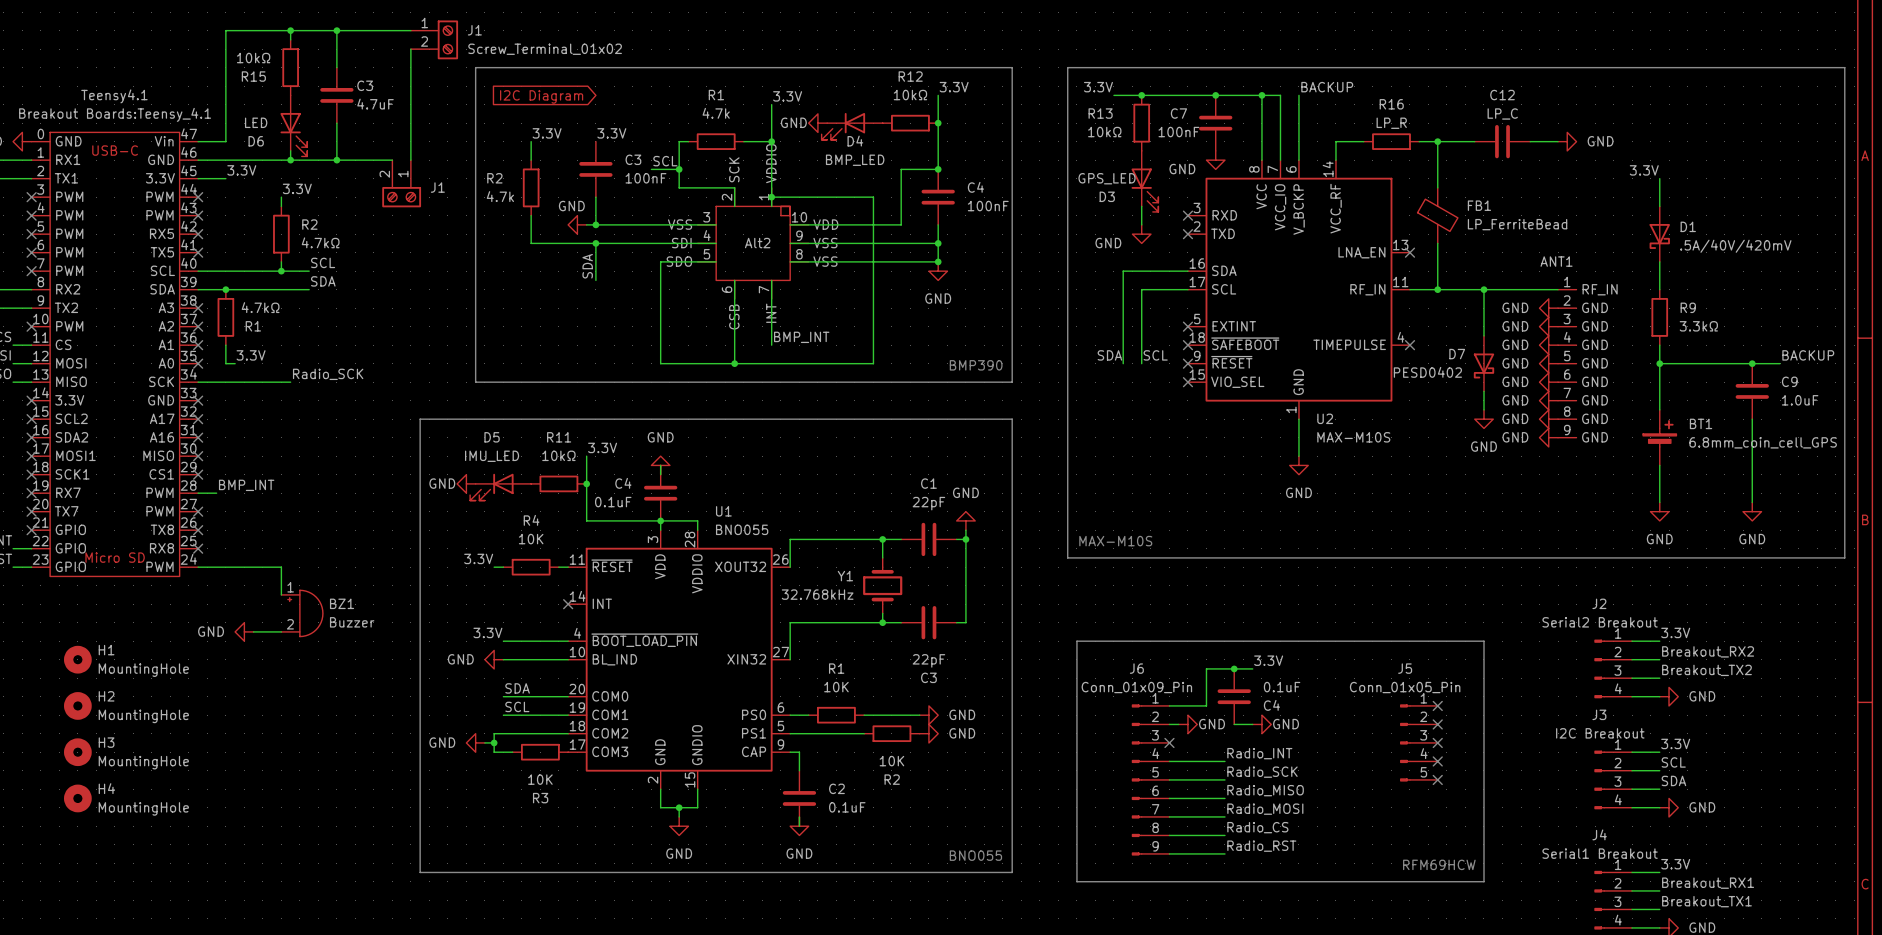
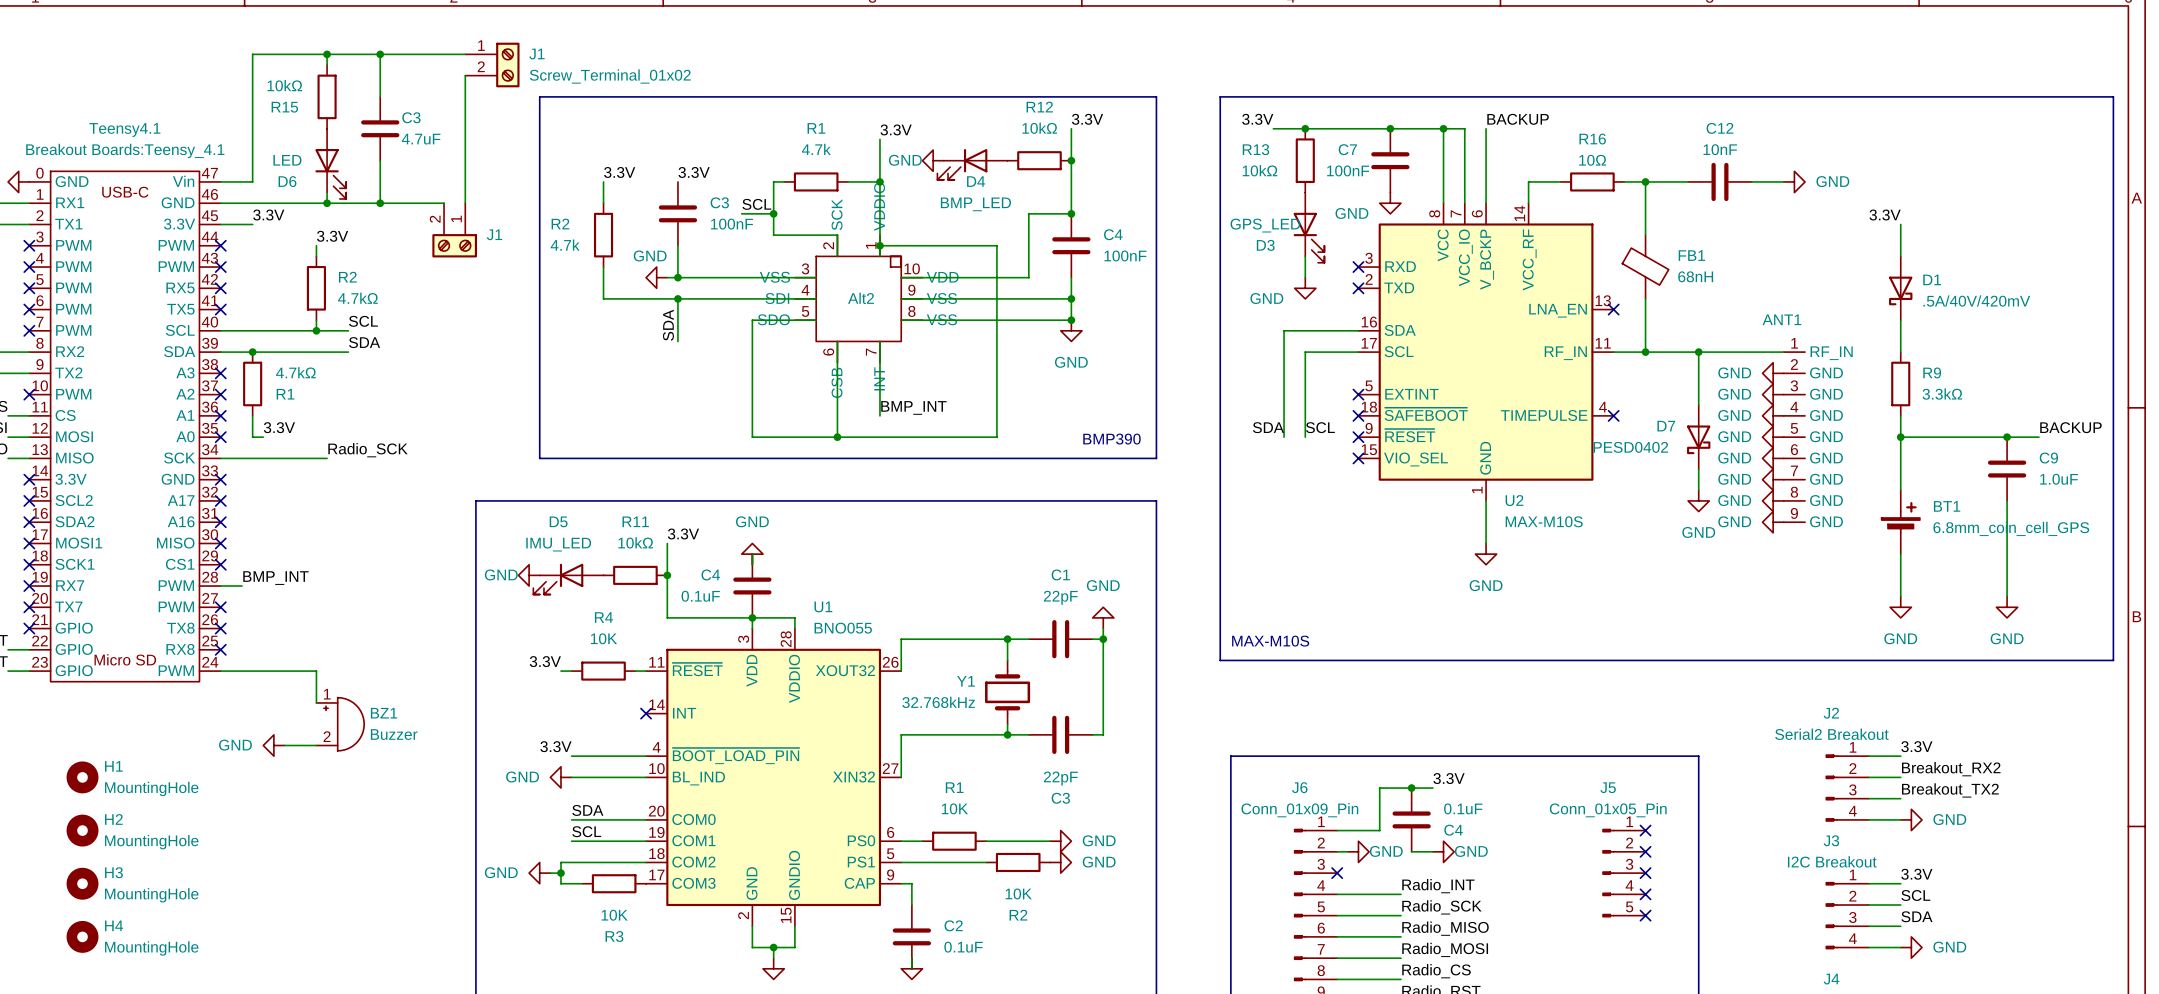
global label: I2C Diagram (541, 96) -> none
C12 value: LP_C (1502, 113) -> 10nF (1720, 149)
R16 value: LP_R (1391, 123) -> 10Ω (1592, 160)
FB1 value: LP_FerriteBead (1517, 224) -> 68nH (1695, 276)

